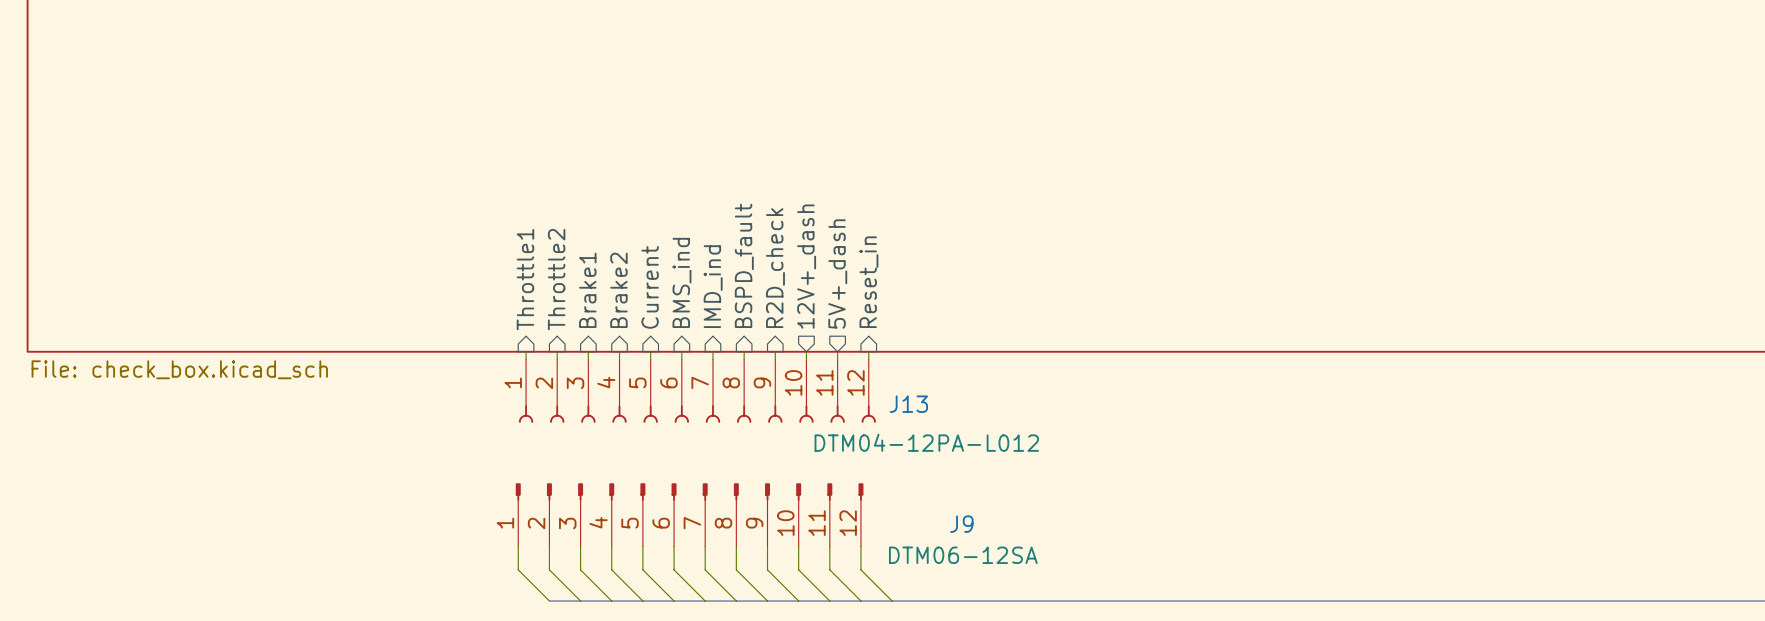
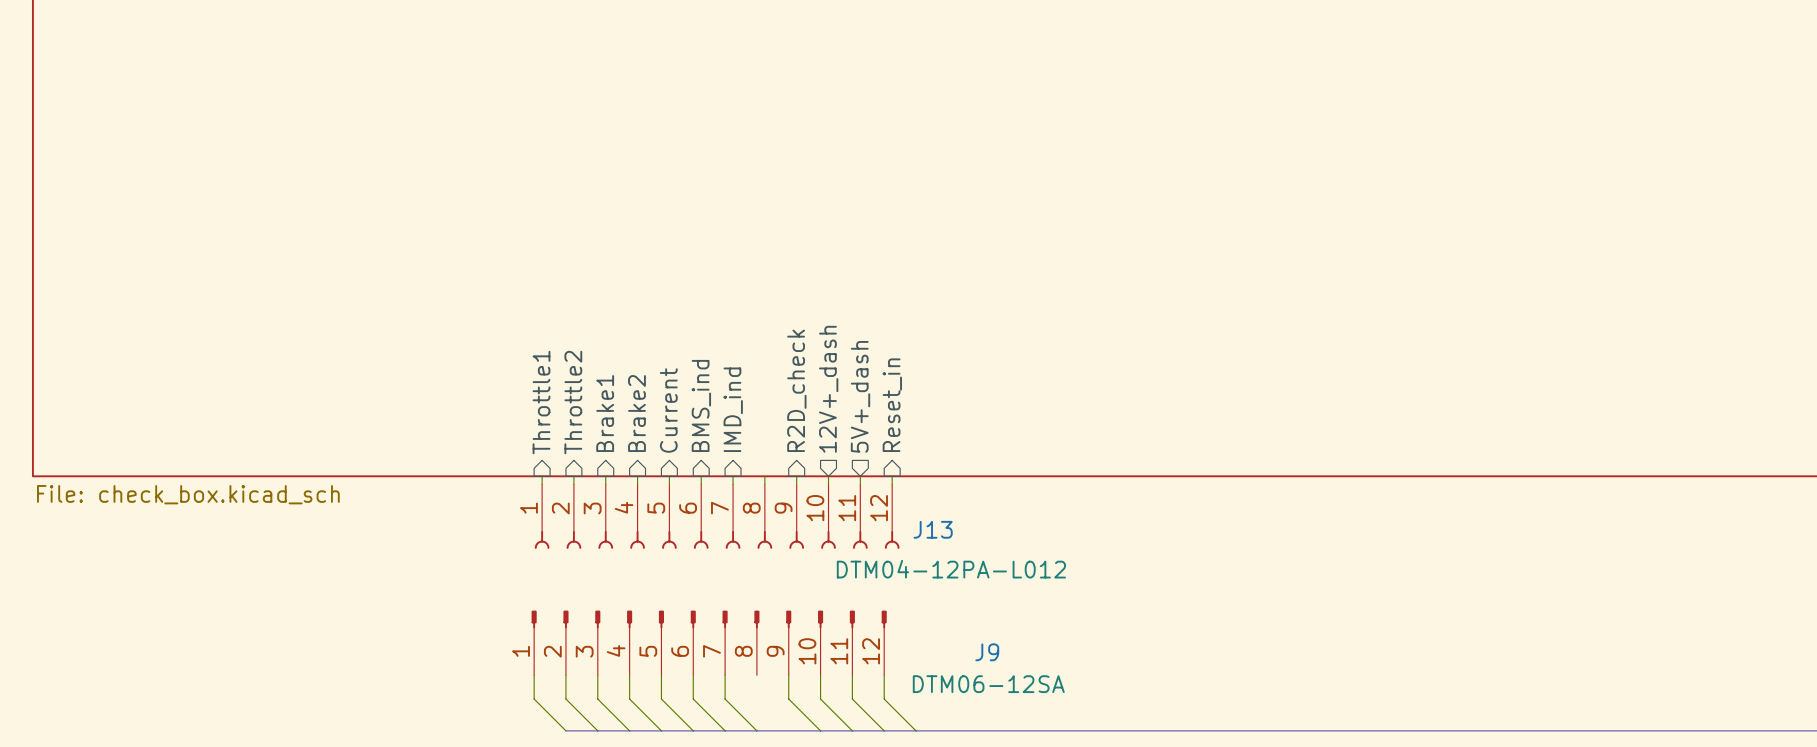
sheet pin: BSPD_fault (744, 265) -> none
wire: (736, 546) (736, 569) (767, 601) -> none

